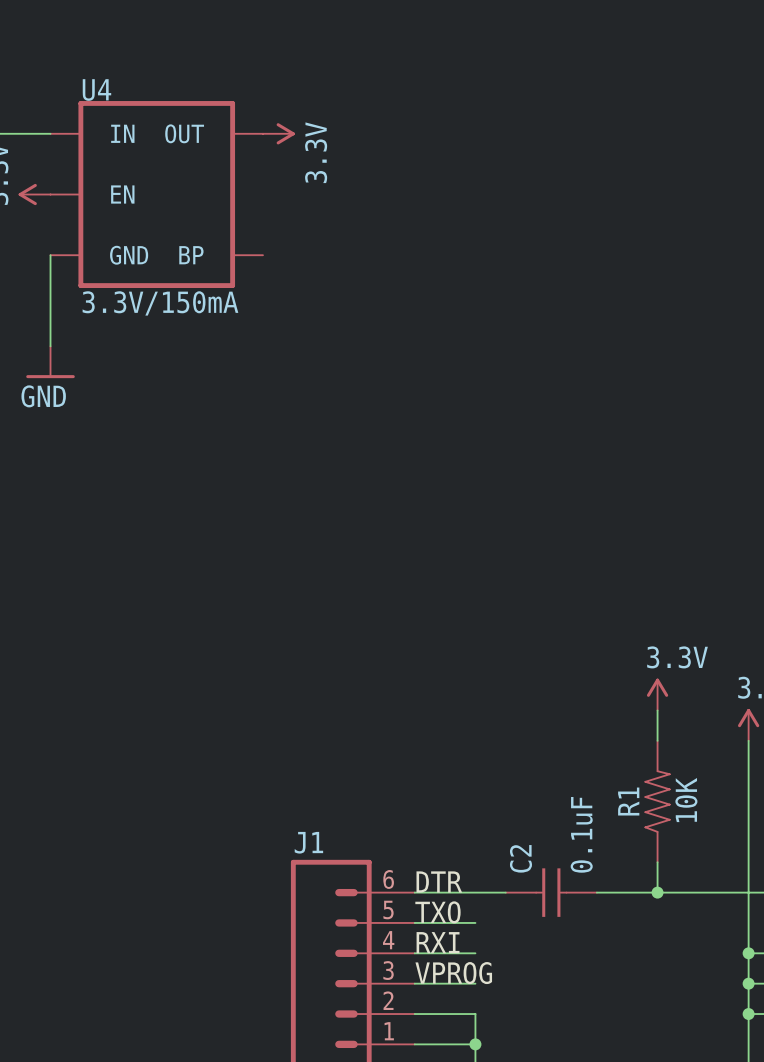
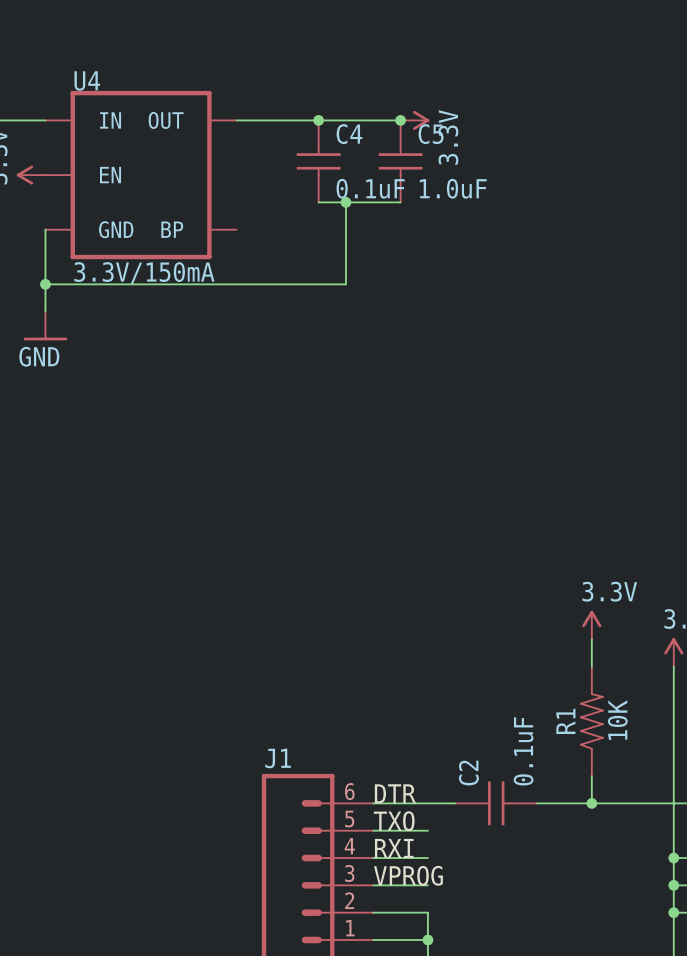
wire: none -> (236, 120) (400, 120)
power symbol position: 3.3V (278, 133) -> 3.3V (414, 120)
junction: none -> (318, 120)
junction: none -> (400, 120)
C4: none -> 0.1uF (318, 161)
C5: none -> 1.0uF (400, 161)
wire: none -> (318, 202) (400, 202)
wire: none -> (345, 202) (345, 284) (45, 284)
junction: none -> (345, 202)
junction: none -> (45, 284)

